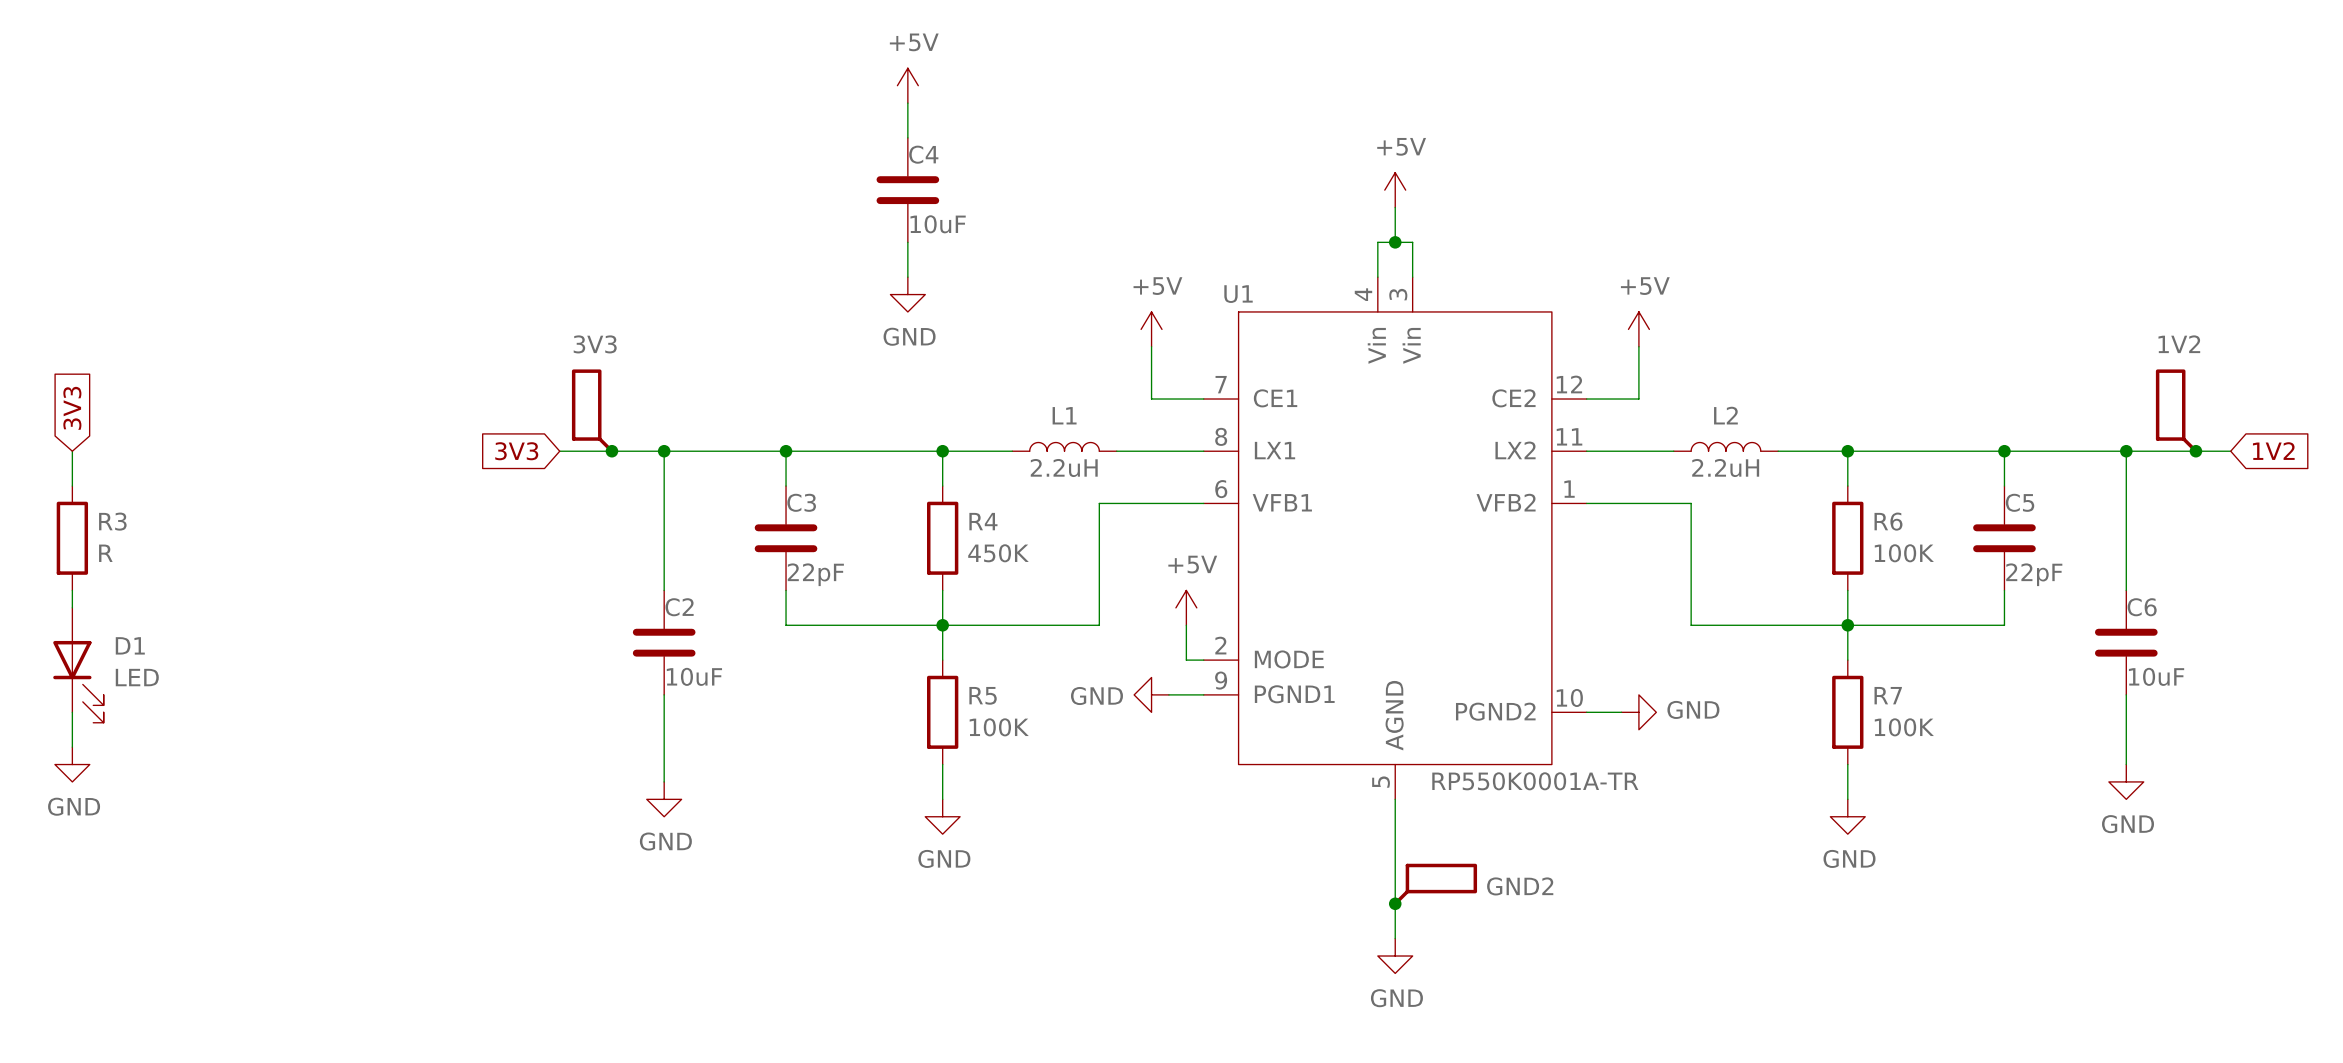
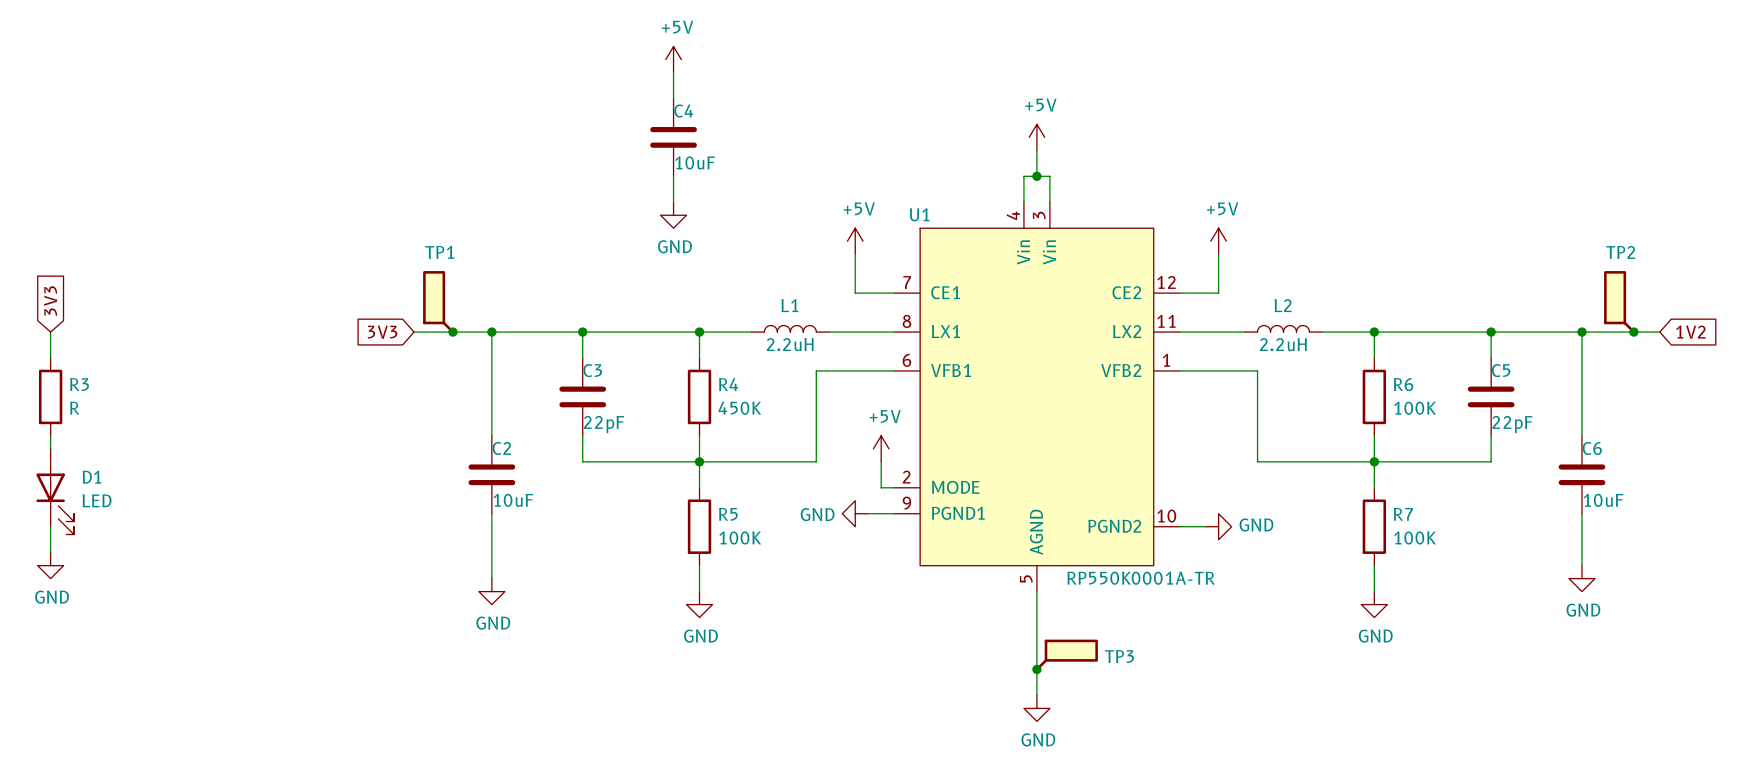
3V3 name: 3V3 (595, 344) -> TP1 (439, 252)
1V2 name: 1V2 (2179, 344) -> TP2 (1620, 252)
GND2 name: GND2 (1520, 886) -> TP3 (1119, 656)

